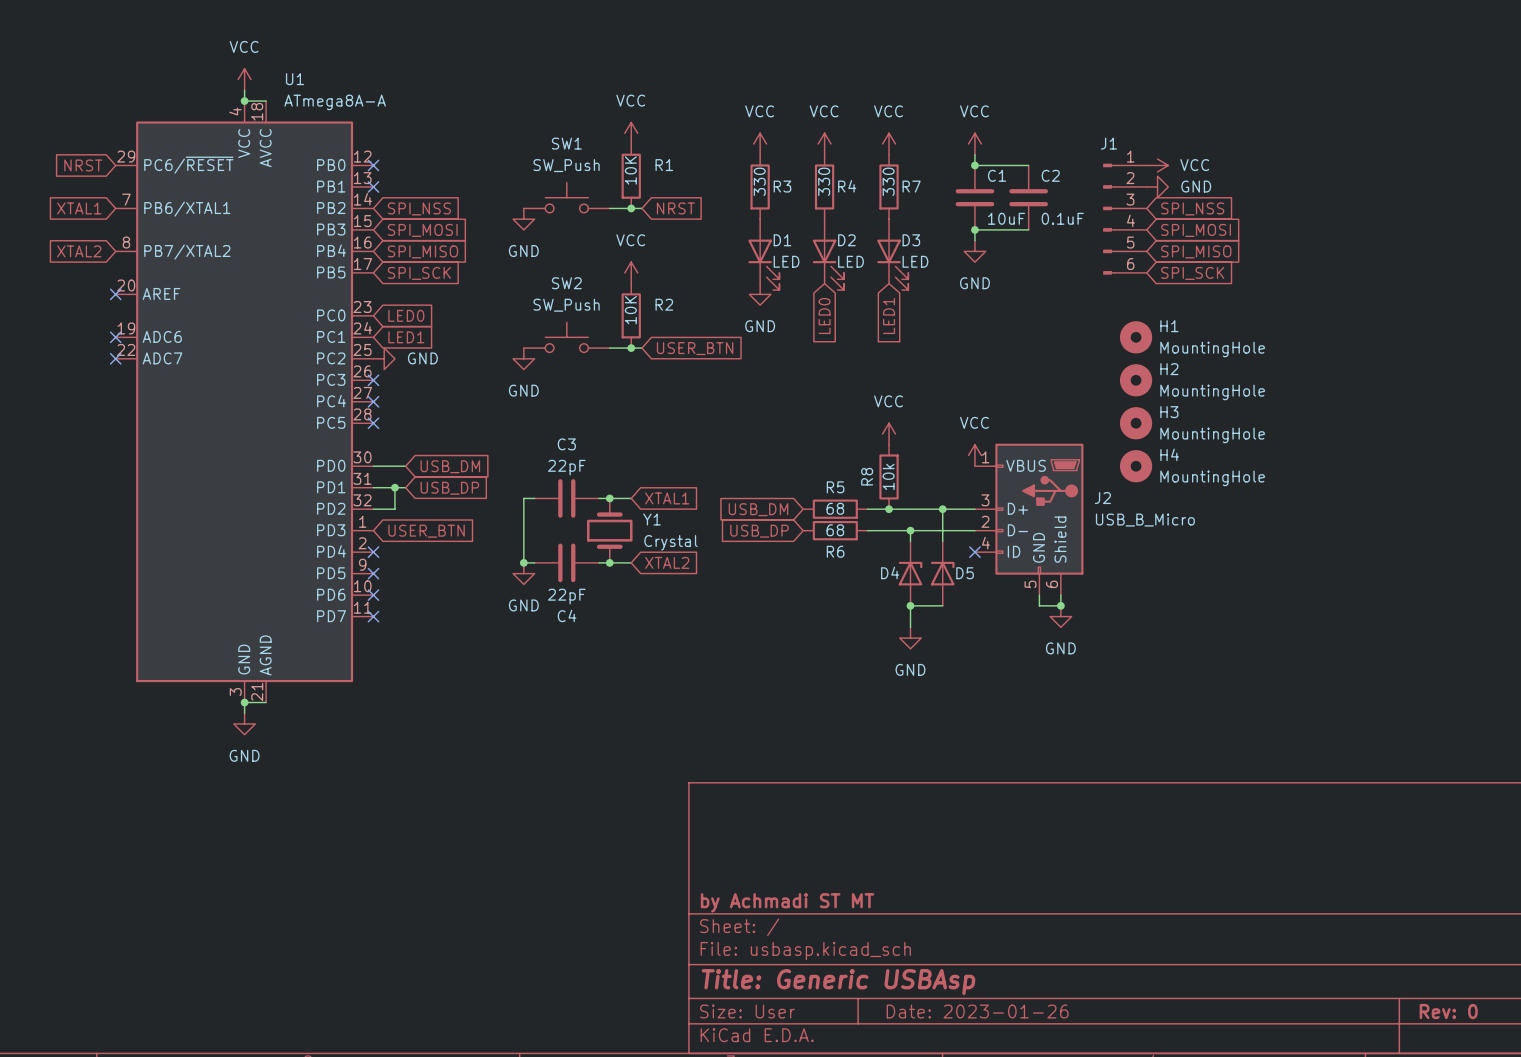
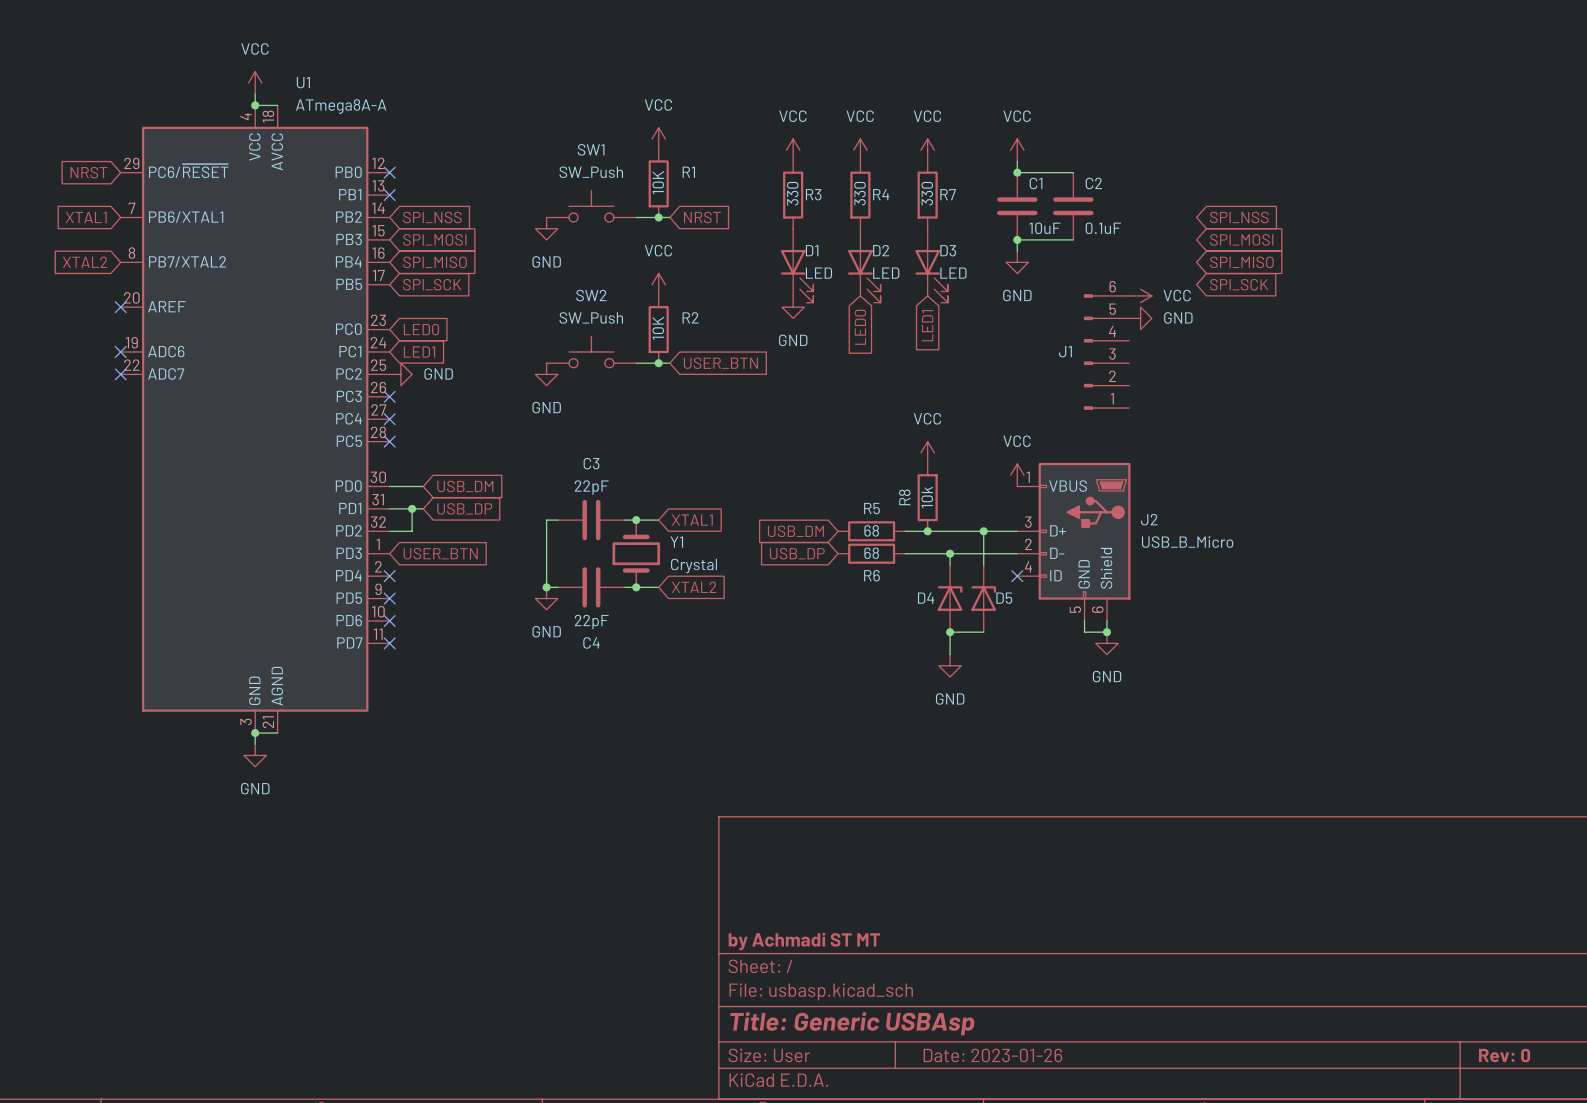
J1 name position: J1 (1108, 143) -> J1 (1065, 351)
power symbol position: VCC (1157, 165) -> VCC (1140, 295)
power symbol position: GND (1157, 186) -> GND (1140, 318)
J1 flip: as is (1109, 219) -> up-down (1090, 351)
J1 position: (1125, 219) -> (1106, 351)
H1: MountingHole (1136, 337) -> none
H2: MountingHole (1136, 380) -> none
H3: MountingHole (1136, 423) -> none
H4: MountingHole (1136, 466) -> none

